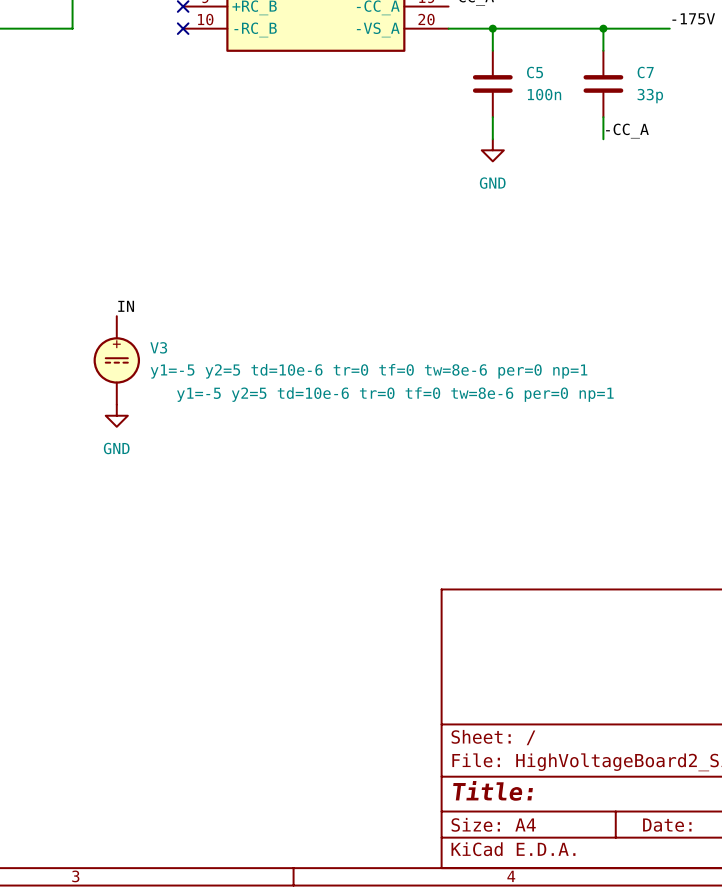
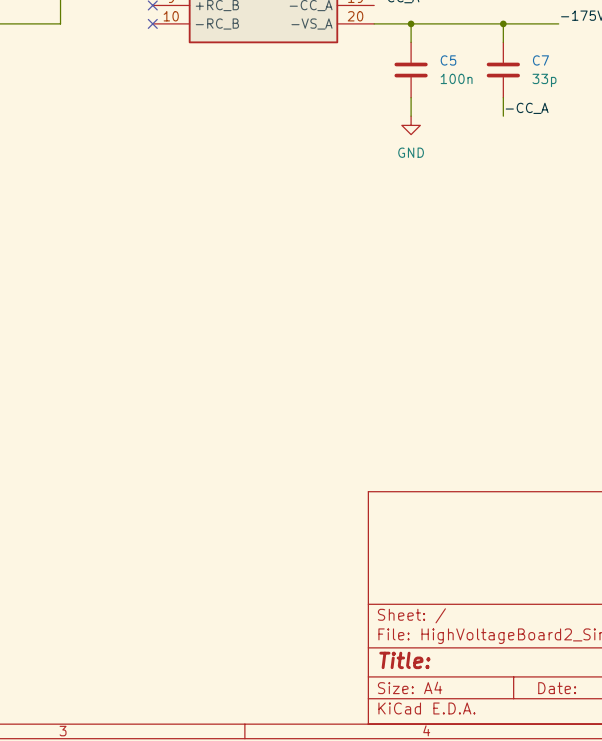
label: IN (126, 306) -> none
V3: y1=-5 y2=5 td=10e-6 tr=0 tf=0 tw=8e-6 per=0 np=1 (116, 360) -> none
power symbol: GND (116, 415) -> none

